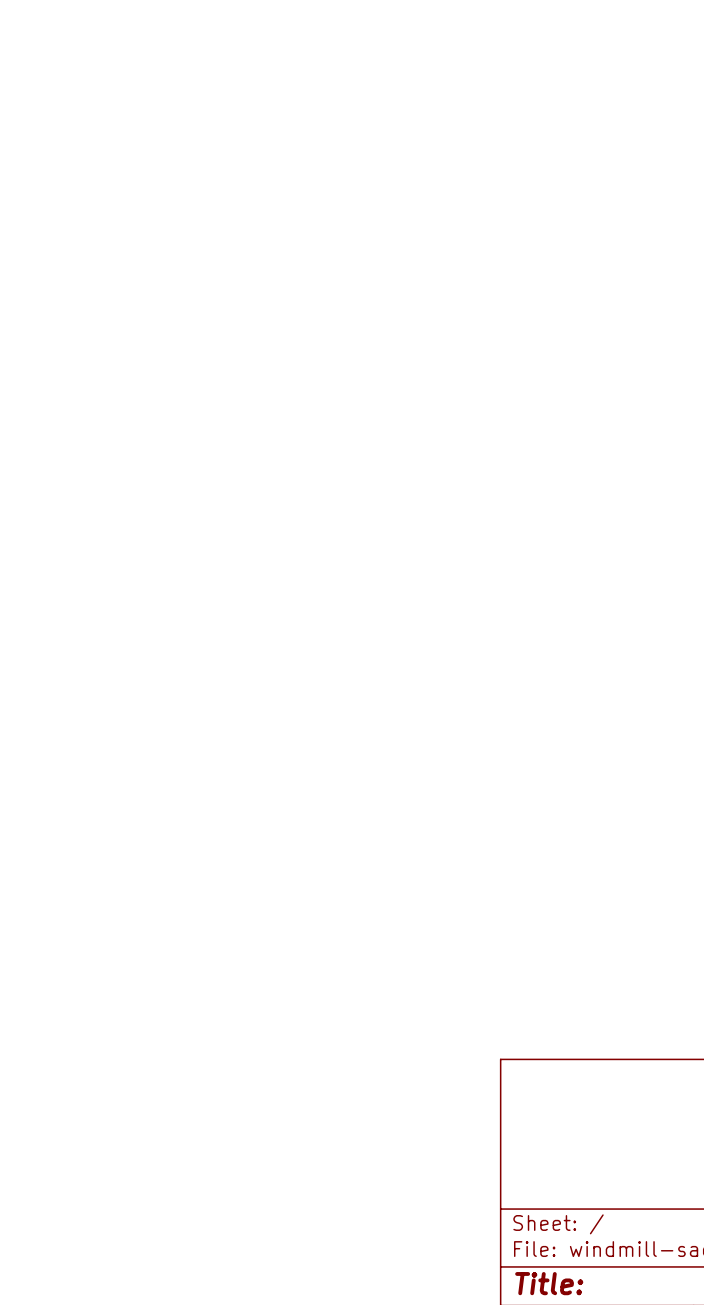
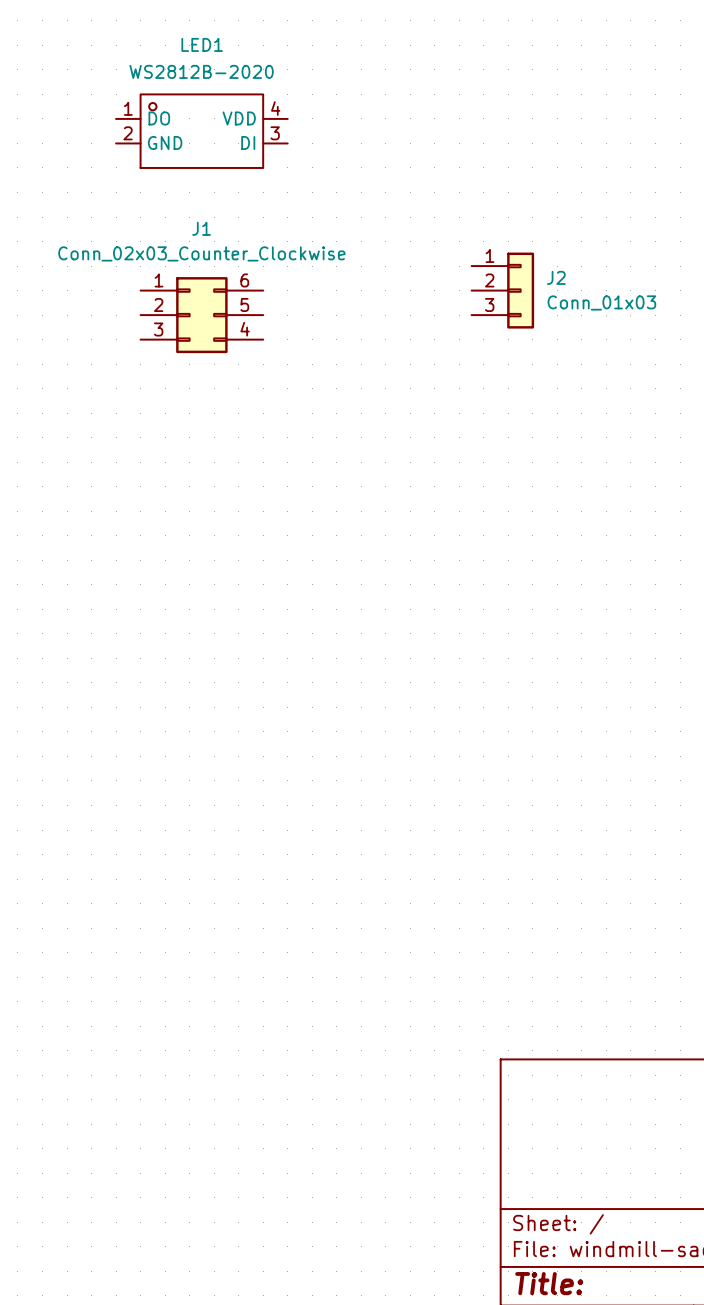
LED1: none -> WS2812B-2020 (201, 131)
J2: none -> Conn_01x03 (502, 290)
J1: none -> Conn_02x03_Counter_Clockwise (201, 315)

